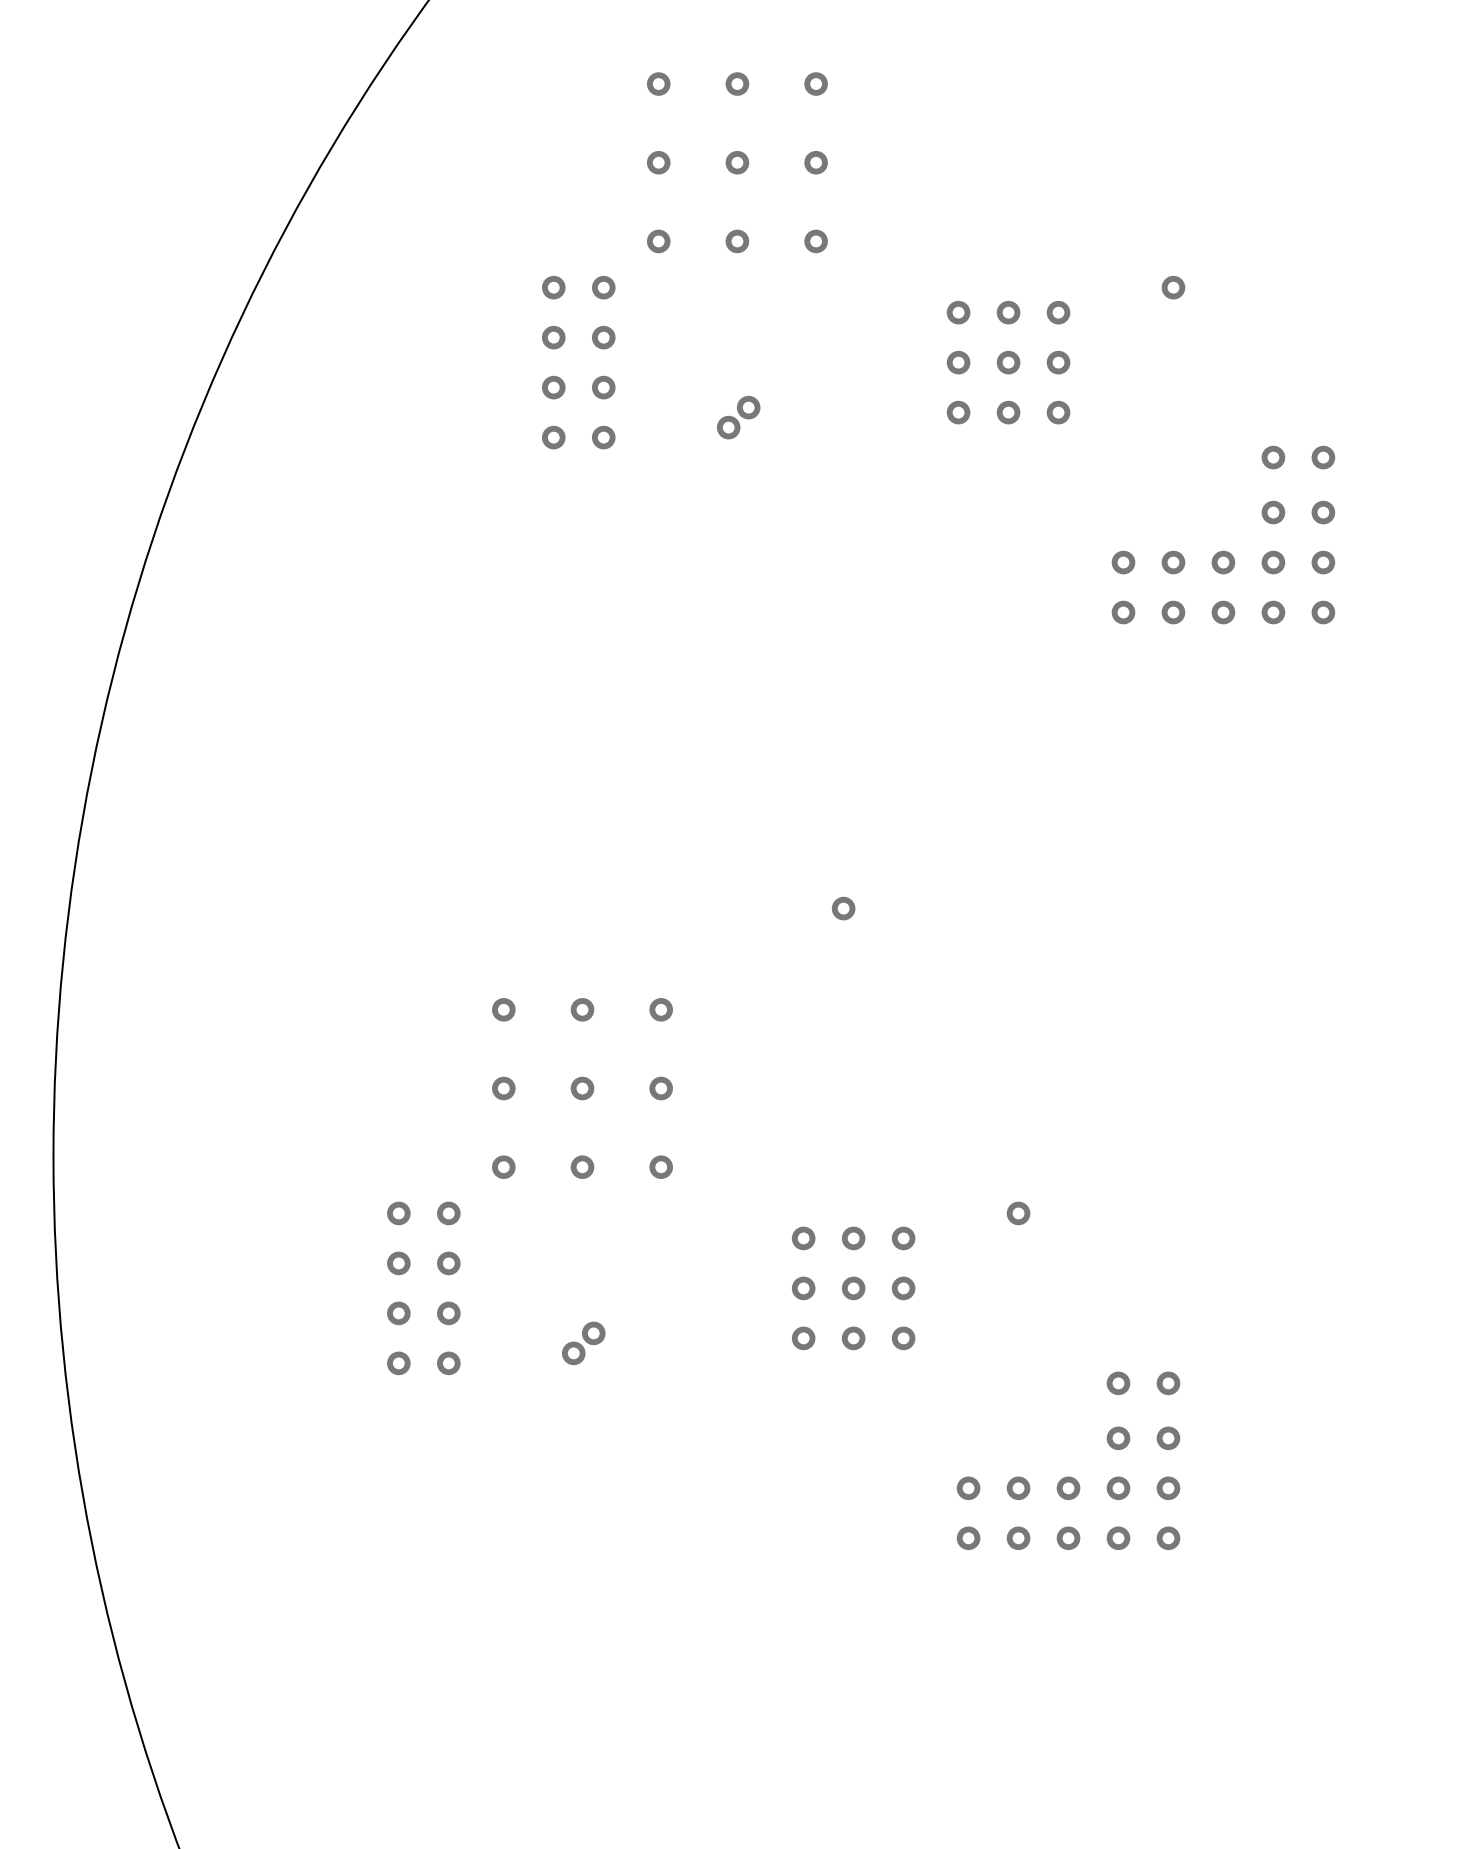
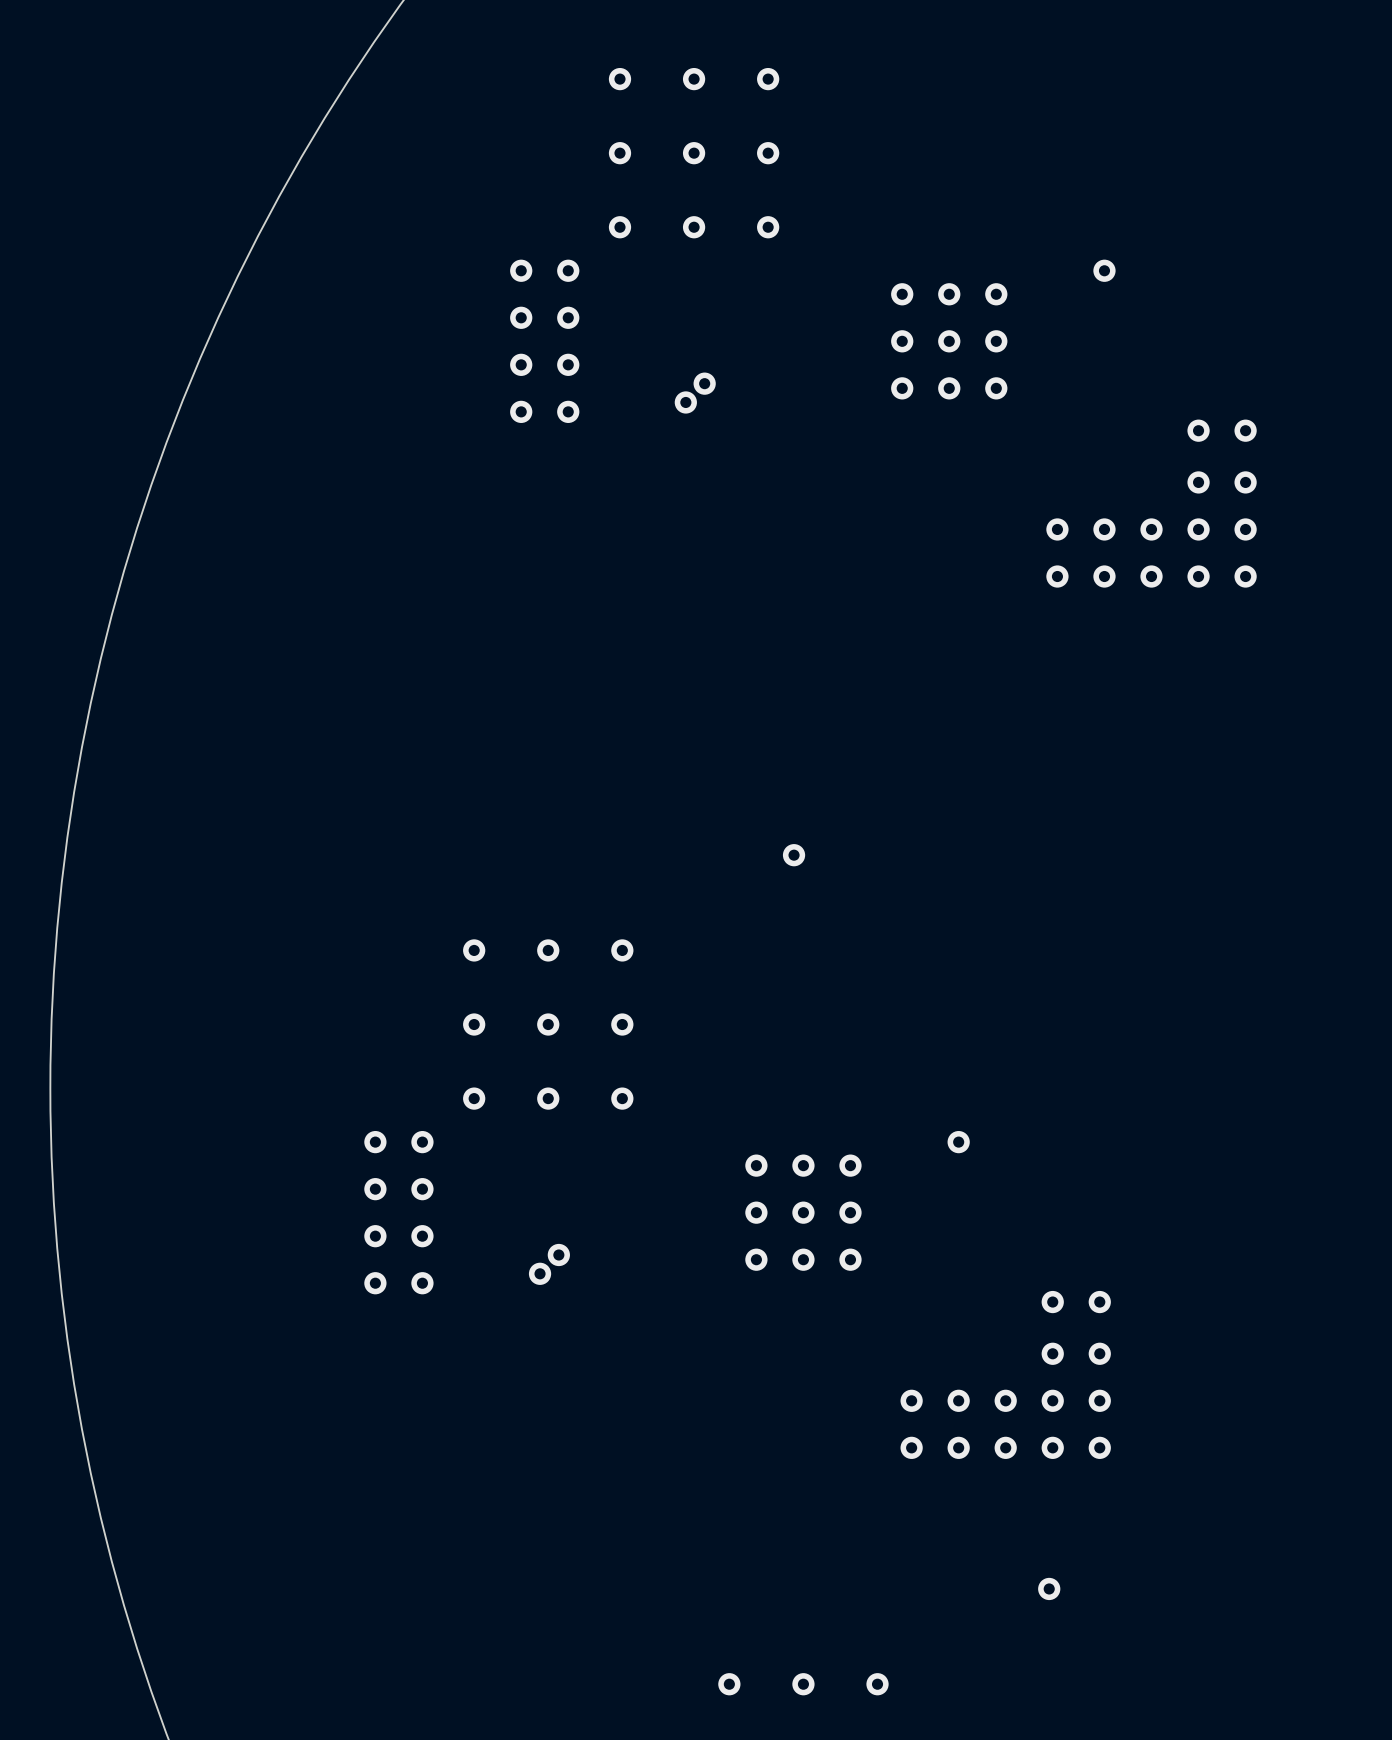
via: none -> (1049, 1588)
via: none -> (729, 1684)
via: none -> (803, 1684)
via: none -> (877, 1684)

